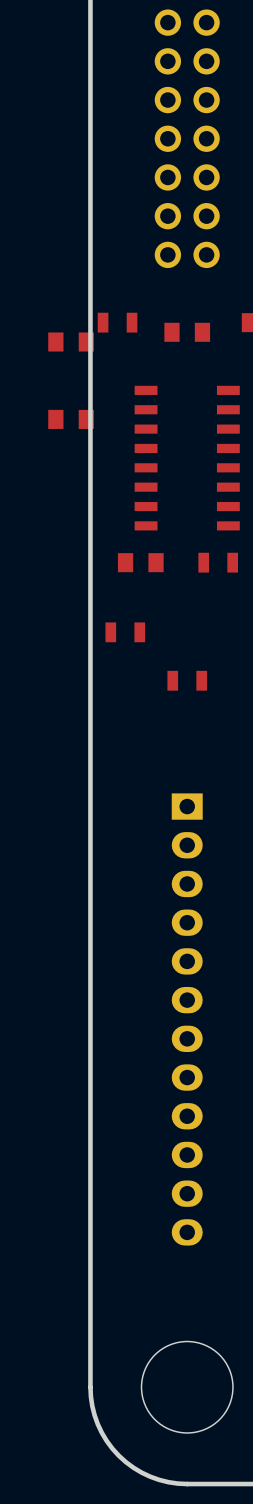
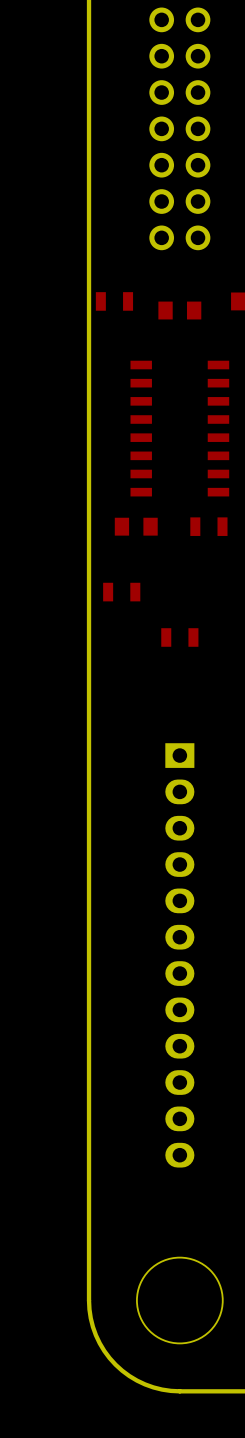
part: (71, 342) -> none
part: (71, 419) -> none

